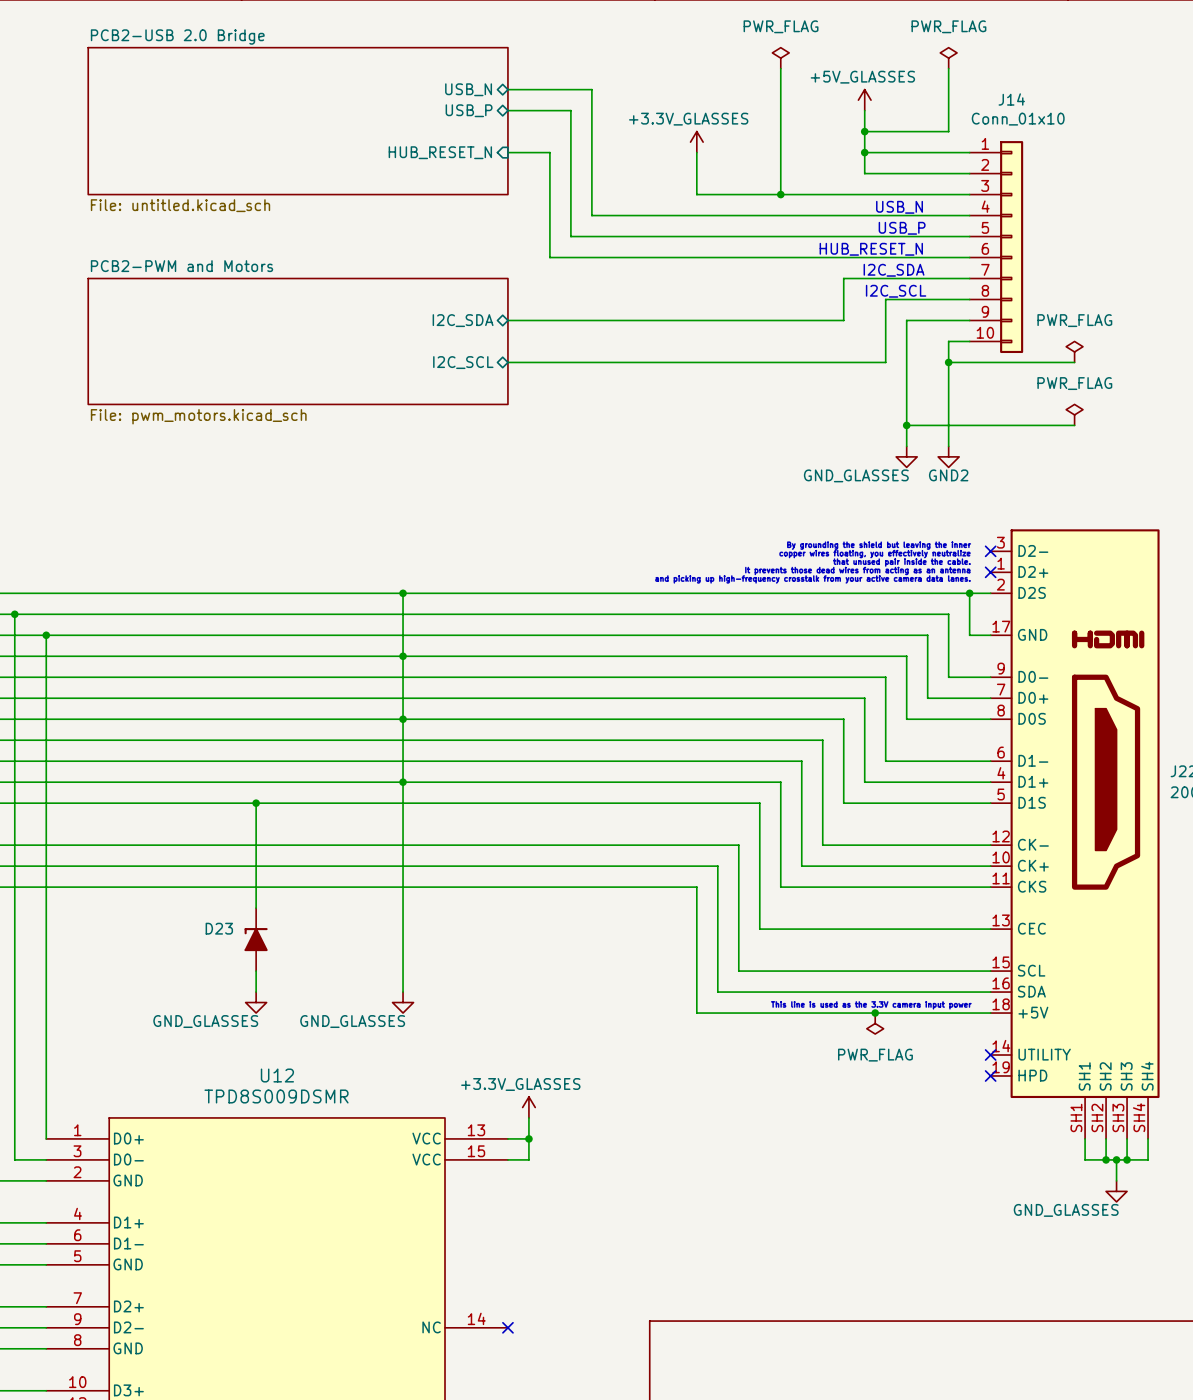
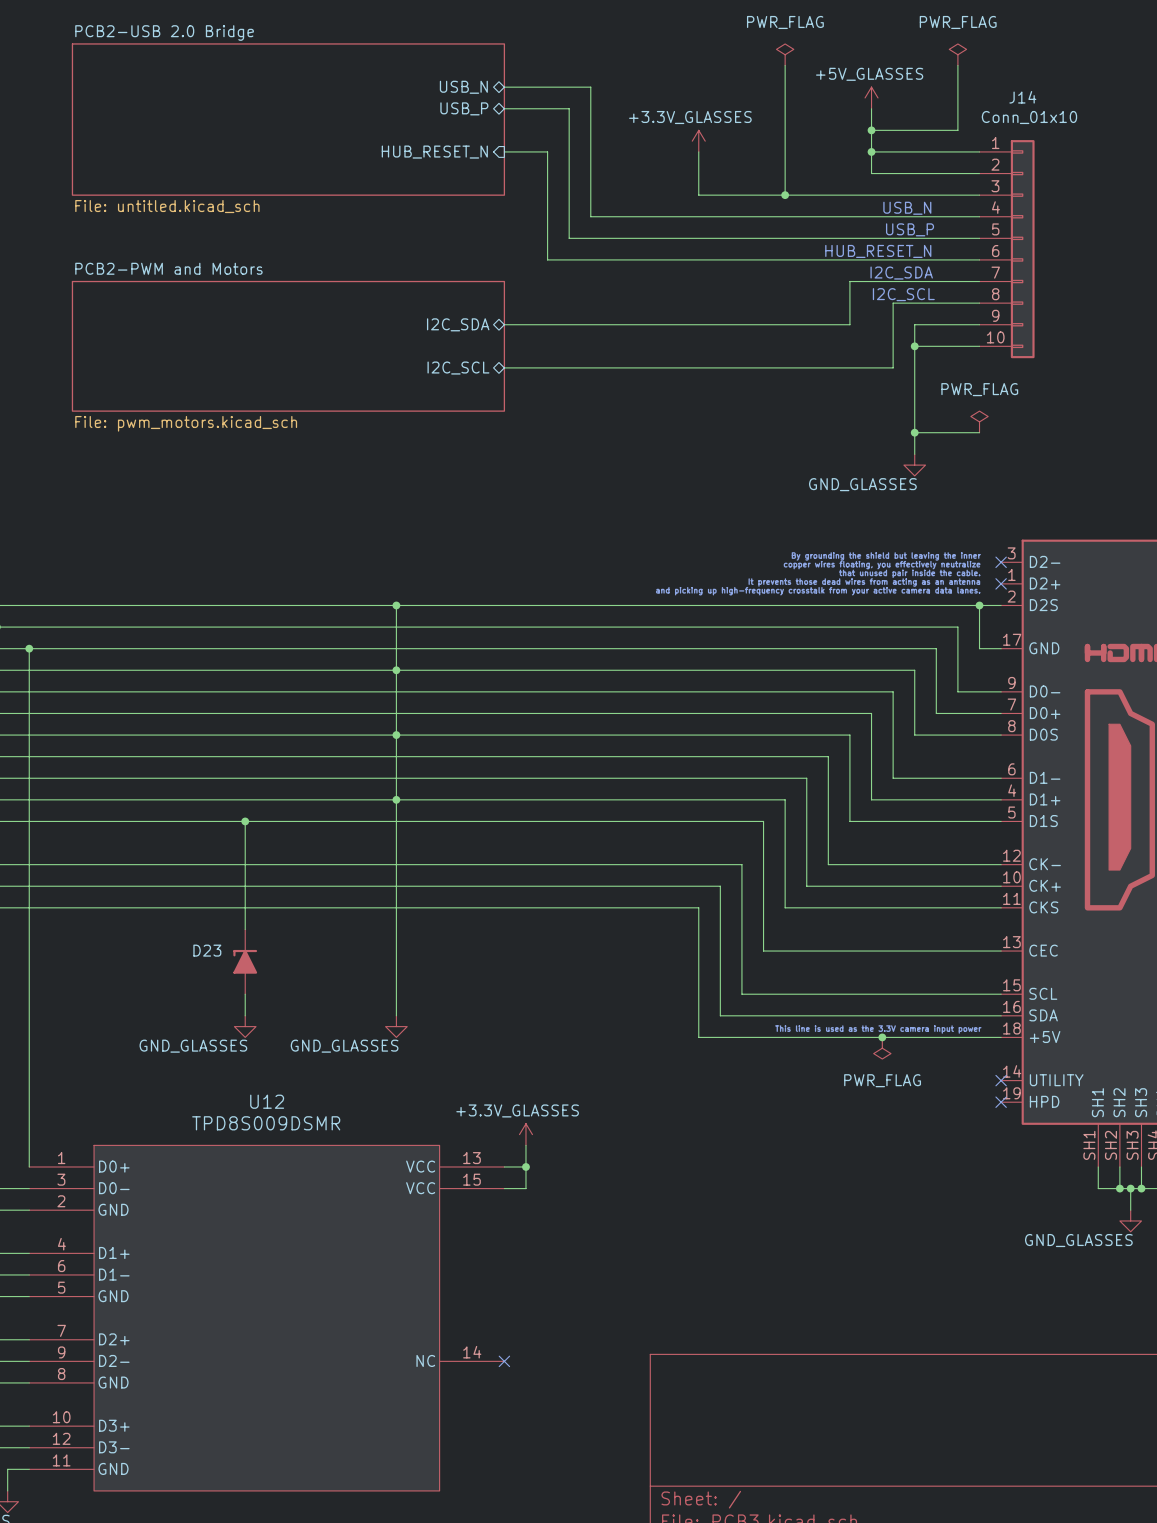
wire: (948, 341) (948, 446) -> (957, 346) (914, 346)
power symbol: PWR_FLAG (1074, 351) -> none
wire: (948, 362) (1074, 362) -> none
junction position: (948, 362) -> (914, 346)
power symbol: none -> PWR_FLAG (979, 421)
power symbol: PWR_FLAG (1074, 414) -> none
wire: (969, 425) (1074, 425) -> none
power symbol: GND2 (948, 456) -> none

